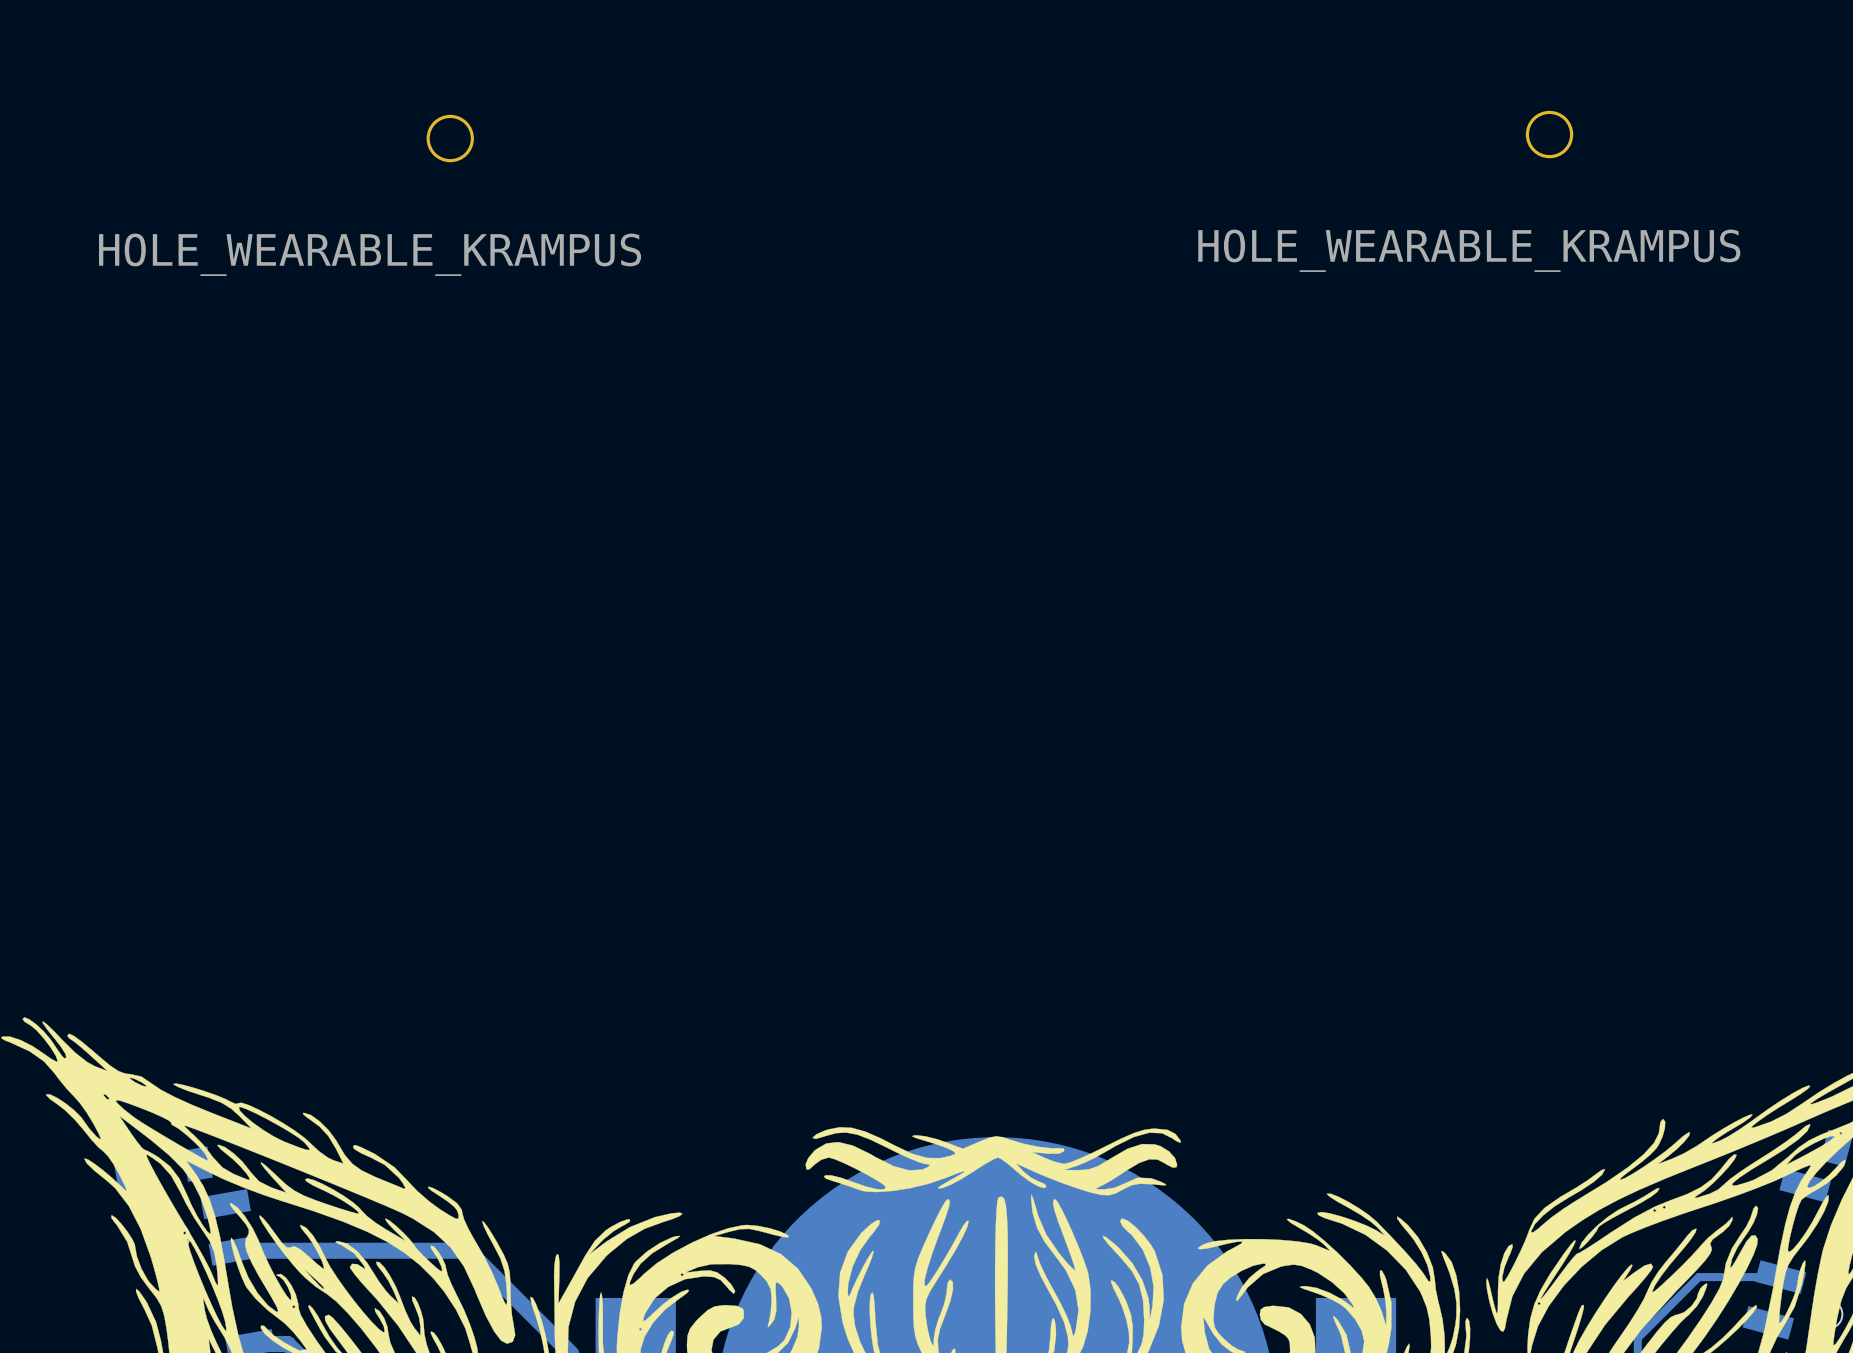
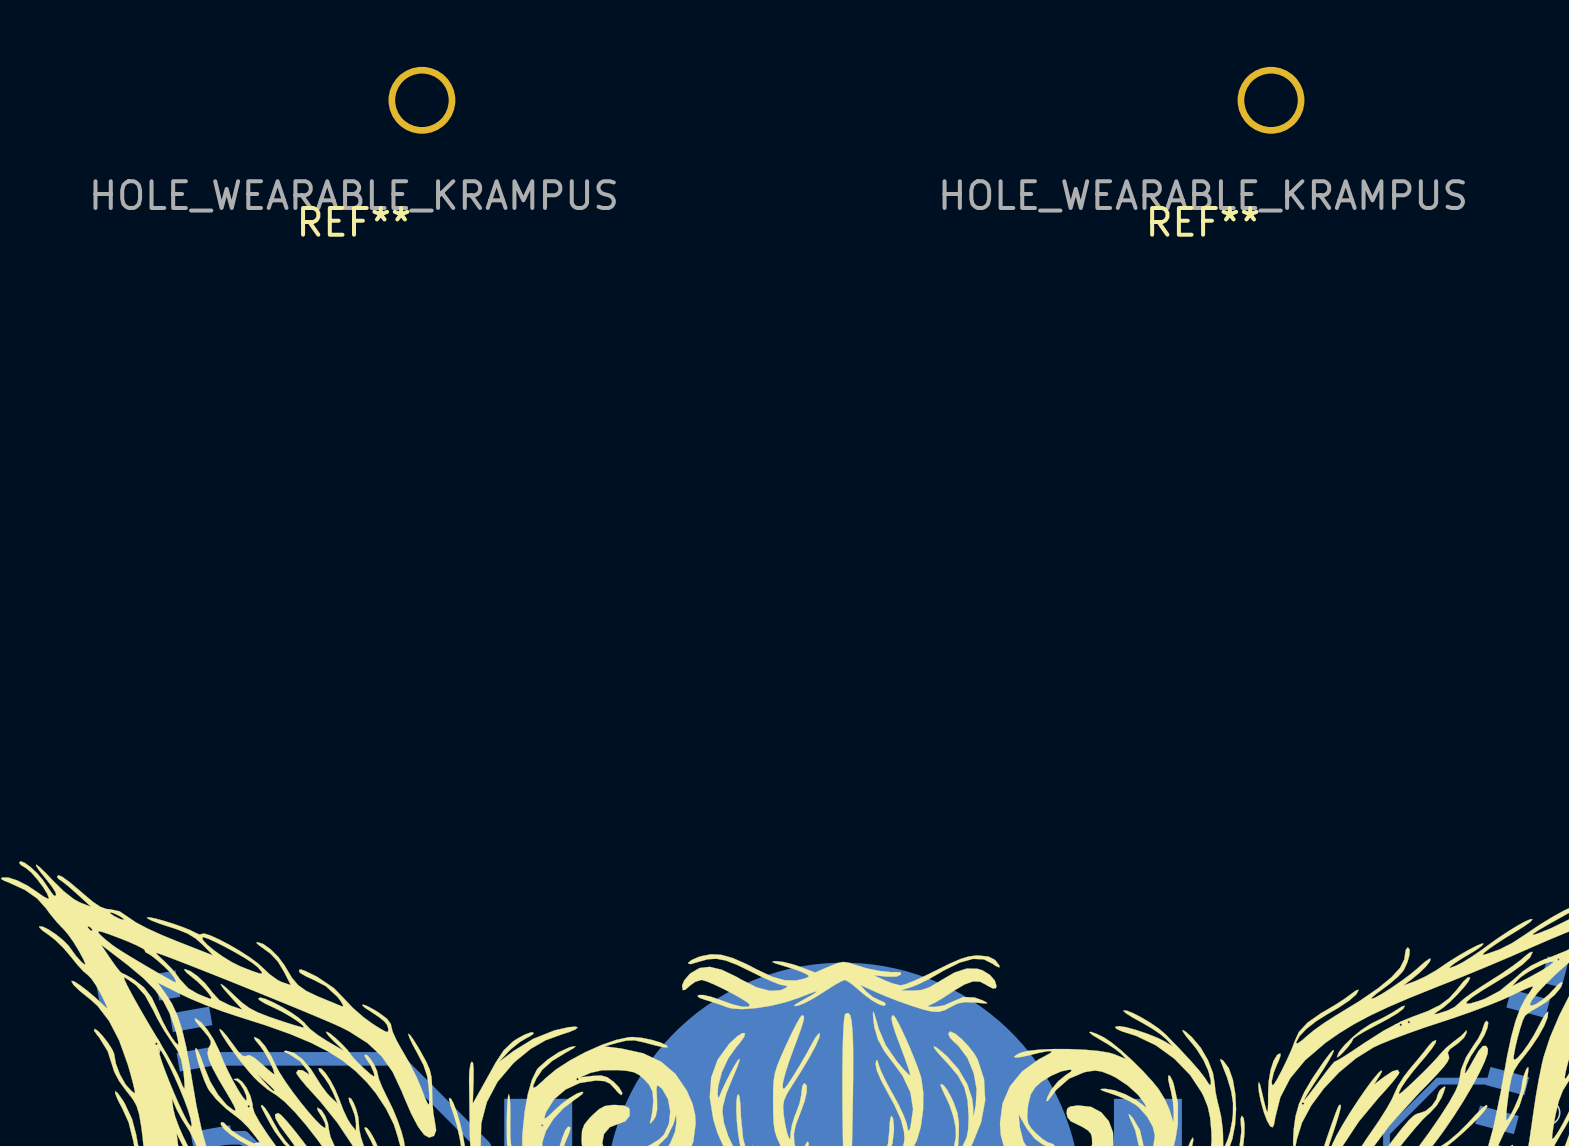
REF**: none -> HOLE_WEARABLE_KRAMPUS (421, 100)
REF**: none -> HOLE_WEARABLE_KRAMPUS (1271, 100)
part: HOLE_WEARABLE_KRAMPUS (1549, 134) -> none
part: HOLE_WEARABLE_KRAMPUS (450, 138) -> none

